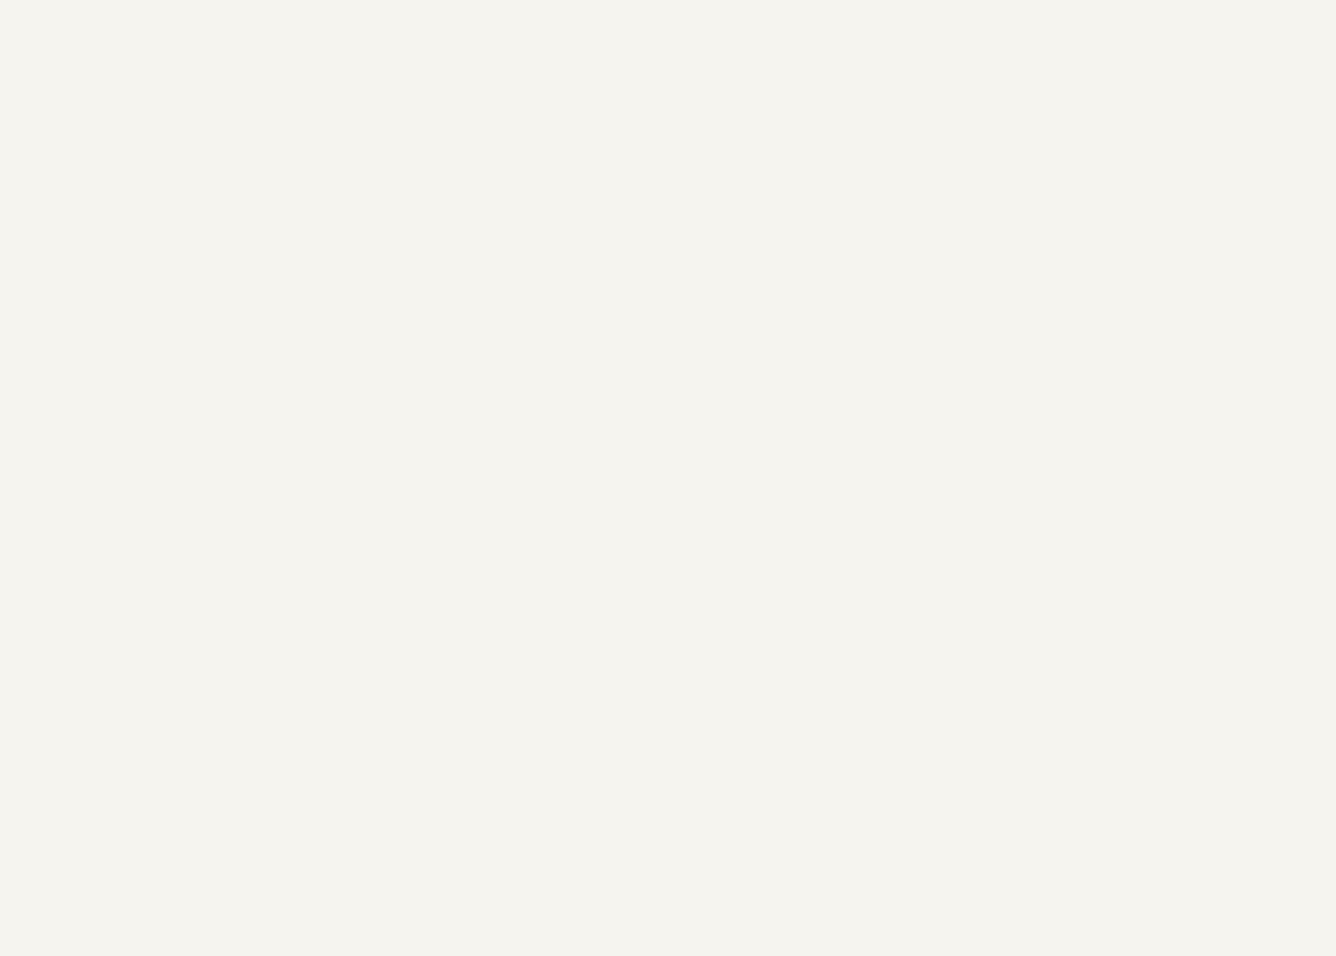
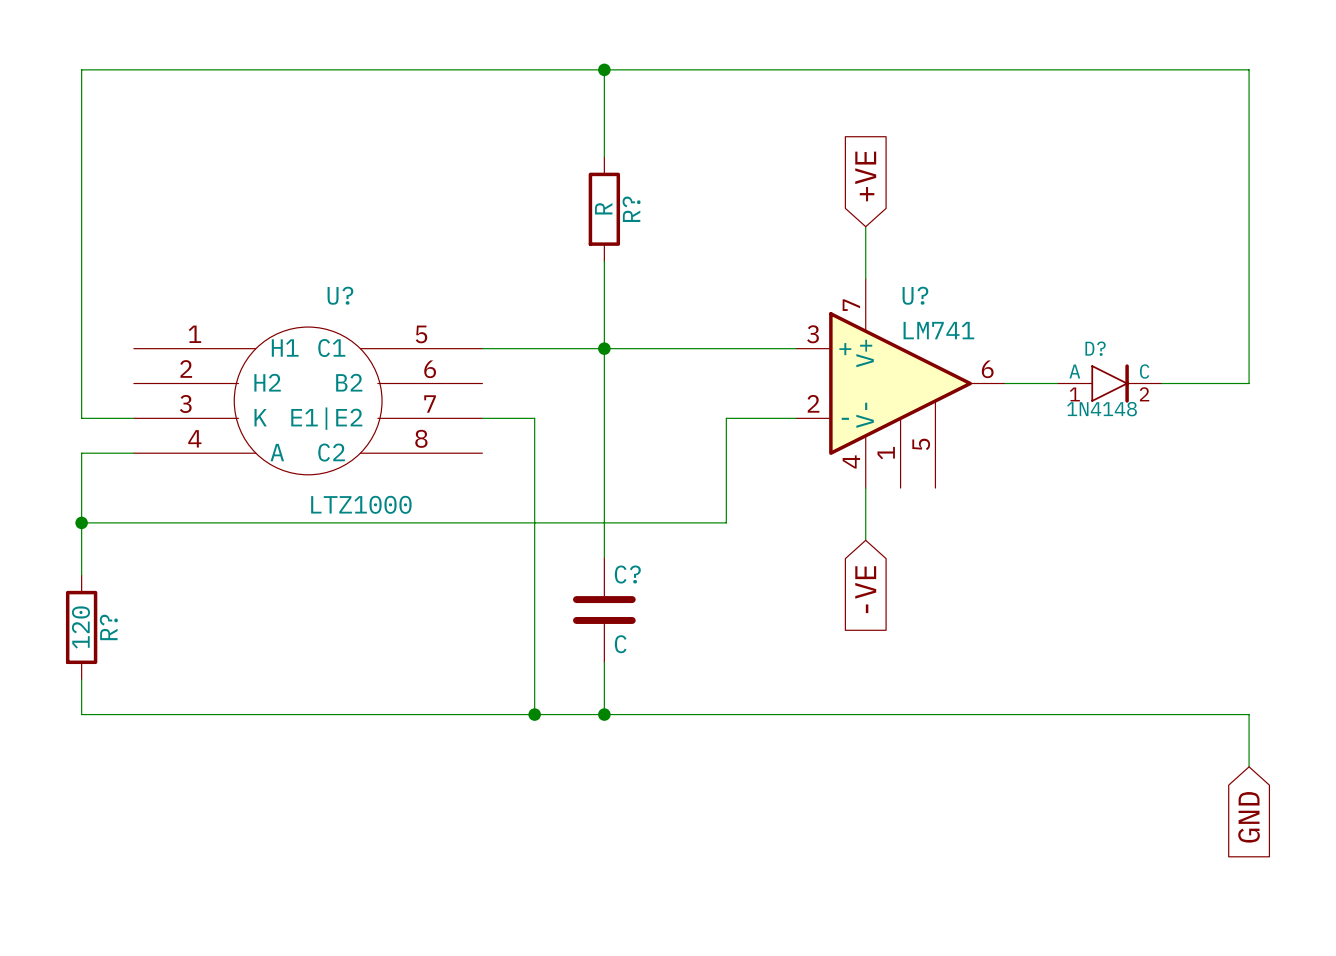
wire: none -> (604, 69) (604, 156)
junction: none -> (604, 69)
global label: none -> +VE (865, 176)
R?: none -> R (604, 209)
wire: none -> (865, 226) (865, 278)
wire: none -> (604, 261) (604, 557)
wire: none -> (482, 348) (796, 348)
junction: none -> (604, 348)
U?: none -> LM741 (900, 383)
wire: none -> (1005, 383) (1057, 383)
D?: none -> 1N4148 (1109, 383)
wire: none -> (1161, 383) (1249, 383) (1249, 69) (81, 69) (81, 418) (133, 418)
U?: none -> LTZ1000 (308, 400)
wire: none -> (482, 418) (534, 418) (534, 714)
wire: none -> (796, 418) (726, 418) (726, 522) (81, 522)
wire: none -> (133, 453) (81, 453) (81, 575)
wire: none -> (865, 488) (865, 540)
junction: none -> (81, 522)
global label: none -> -VE (865, 589)
C?: none -> C (604, 610)
R?: none -> 120 (81, 627)
wire: none -> (604, 662) (604, 714)
wire: none -> (81, 679) (81, 714) (1249, 714) (1249, 766)
junction: none -> (534, 714)
junction: none -> (604, 714)
global label: none -> GND (1249, 817)

